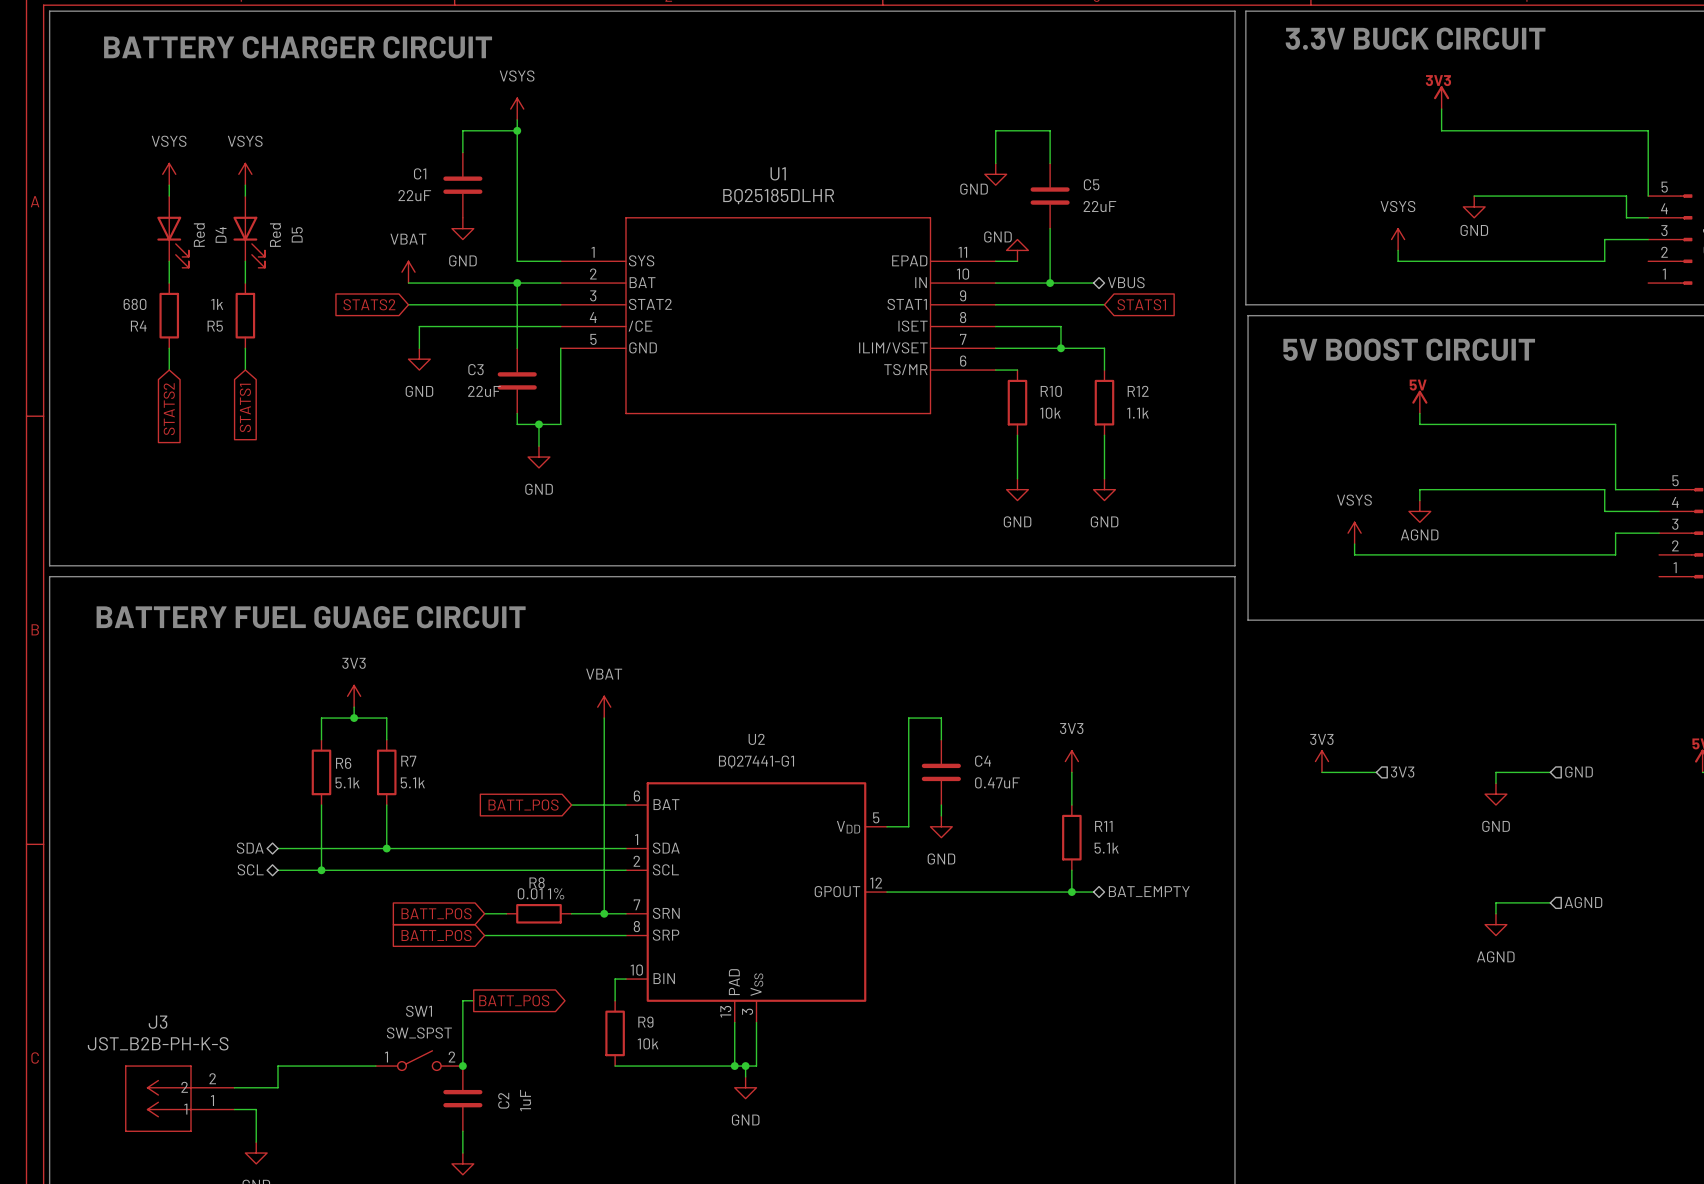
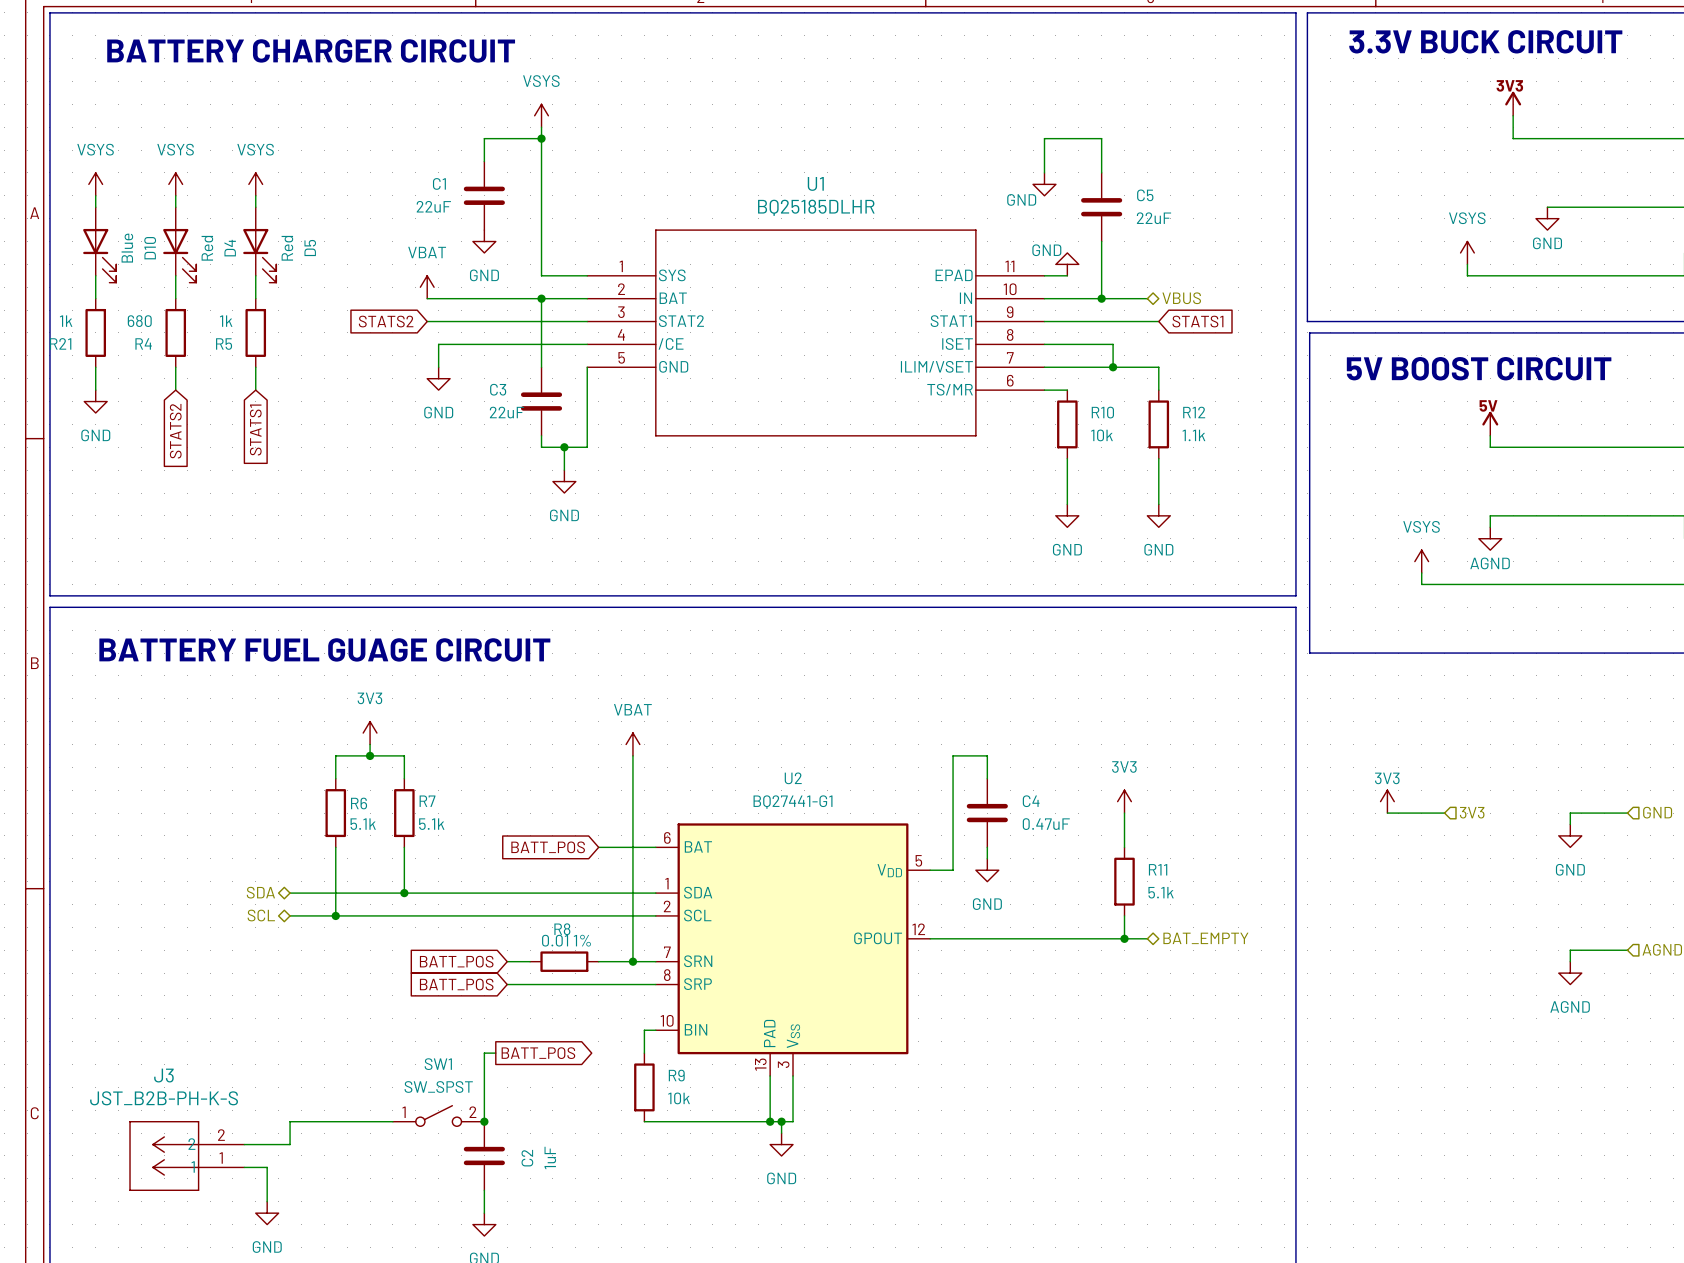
power symbol: none -> VSYS (95, 184)
wire: none -> (95, 195) (95, 207)
D10: none -> Blue (99, 244)
wire: none -> (95, 275) (95, 298)
R21: none -> 1k (95, 332)
wire: none -> (95, 367) (95, 390)
power symbol: none -> GND (95, 401)

